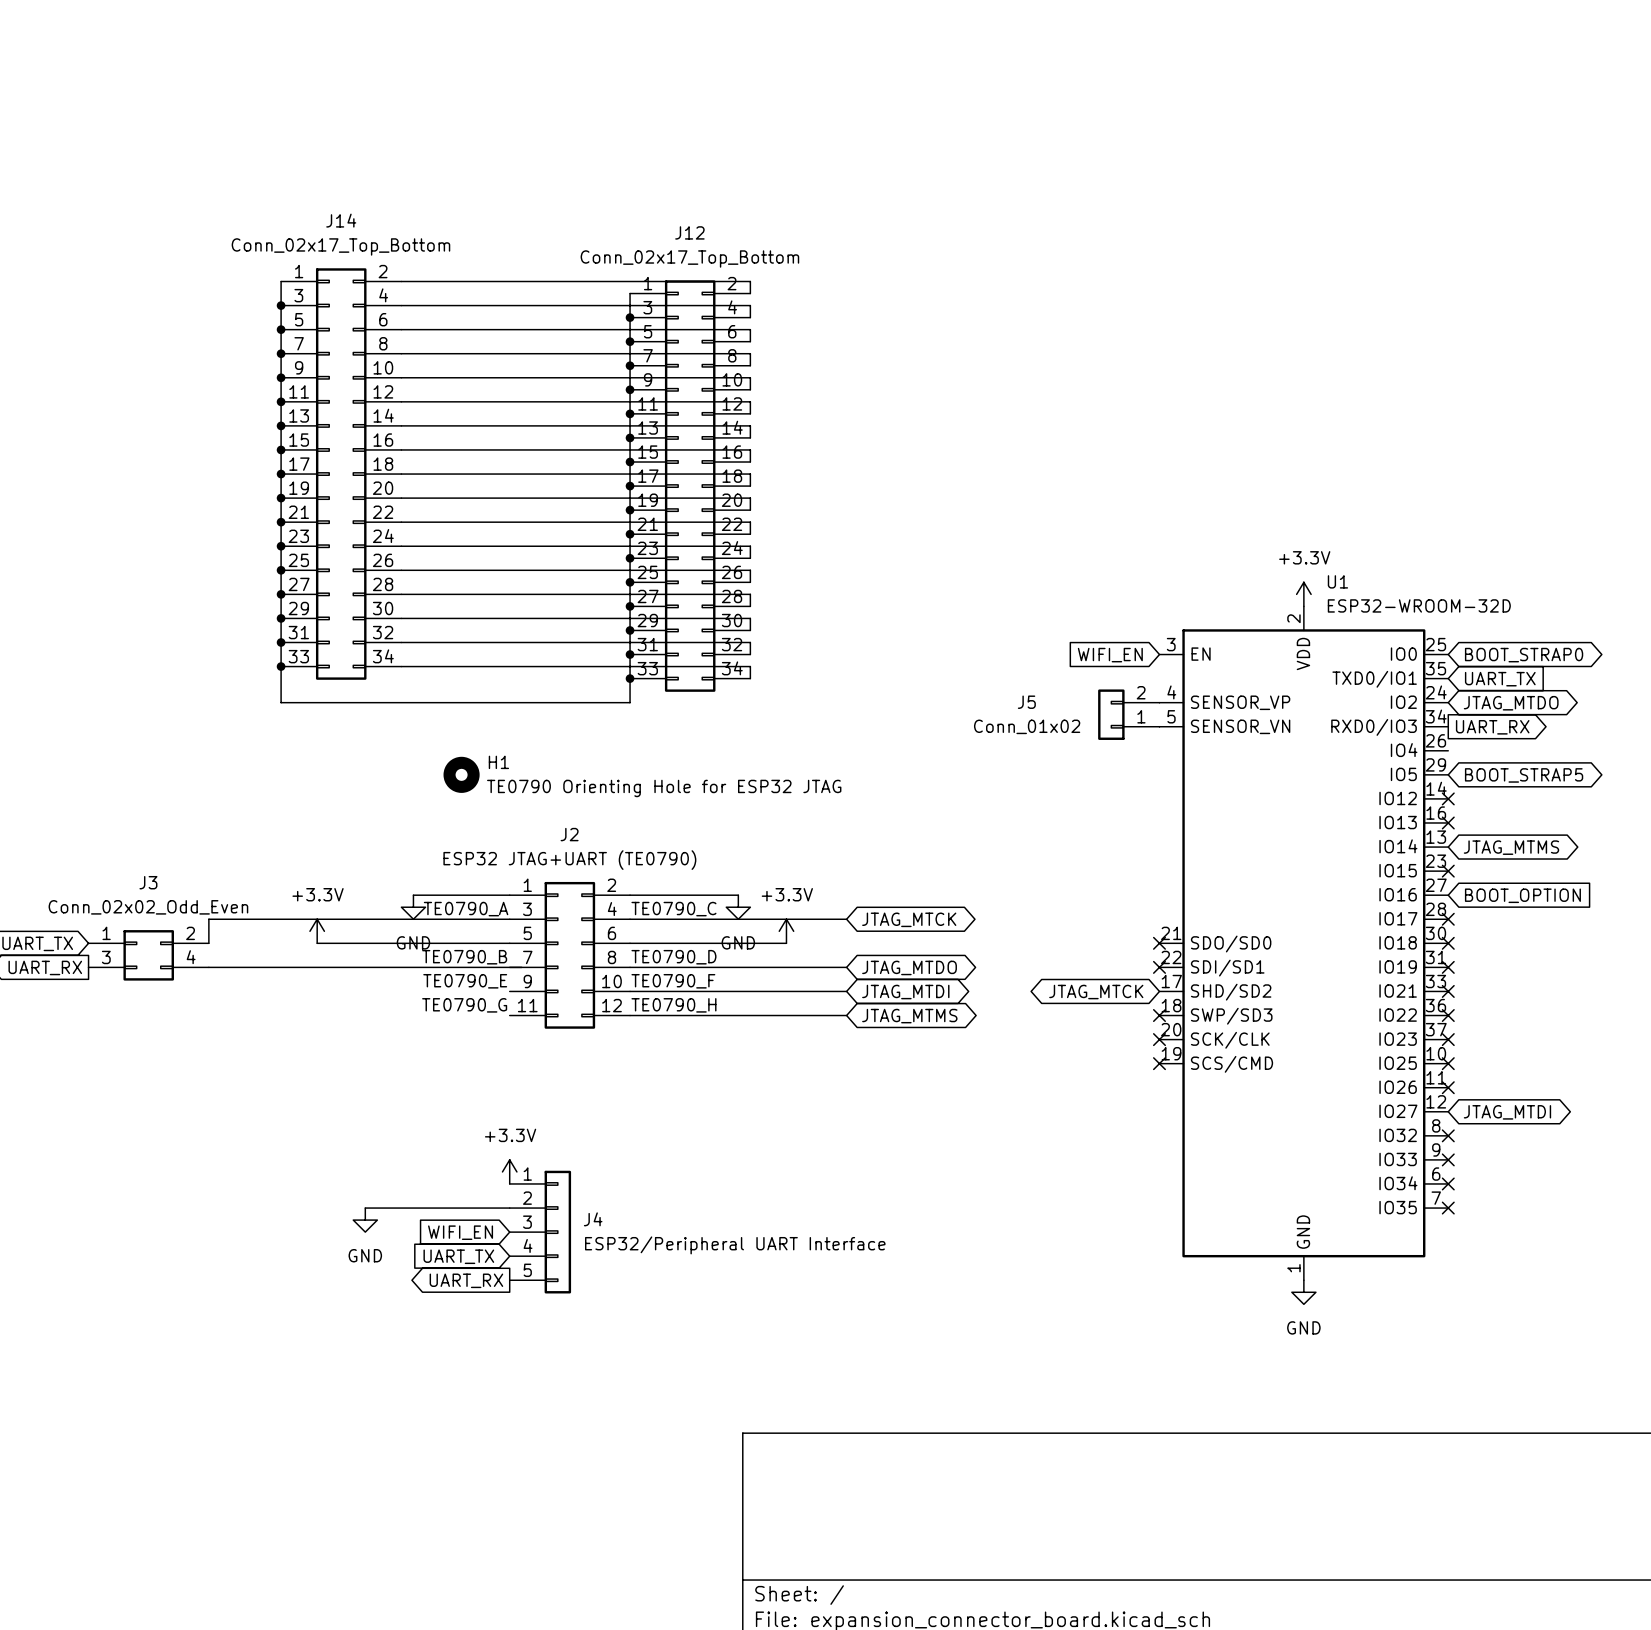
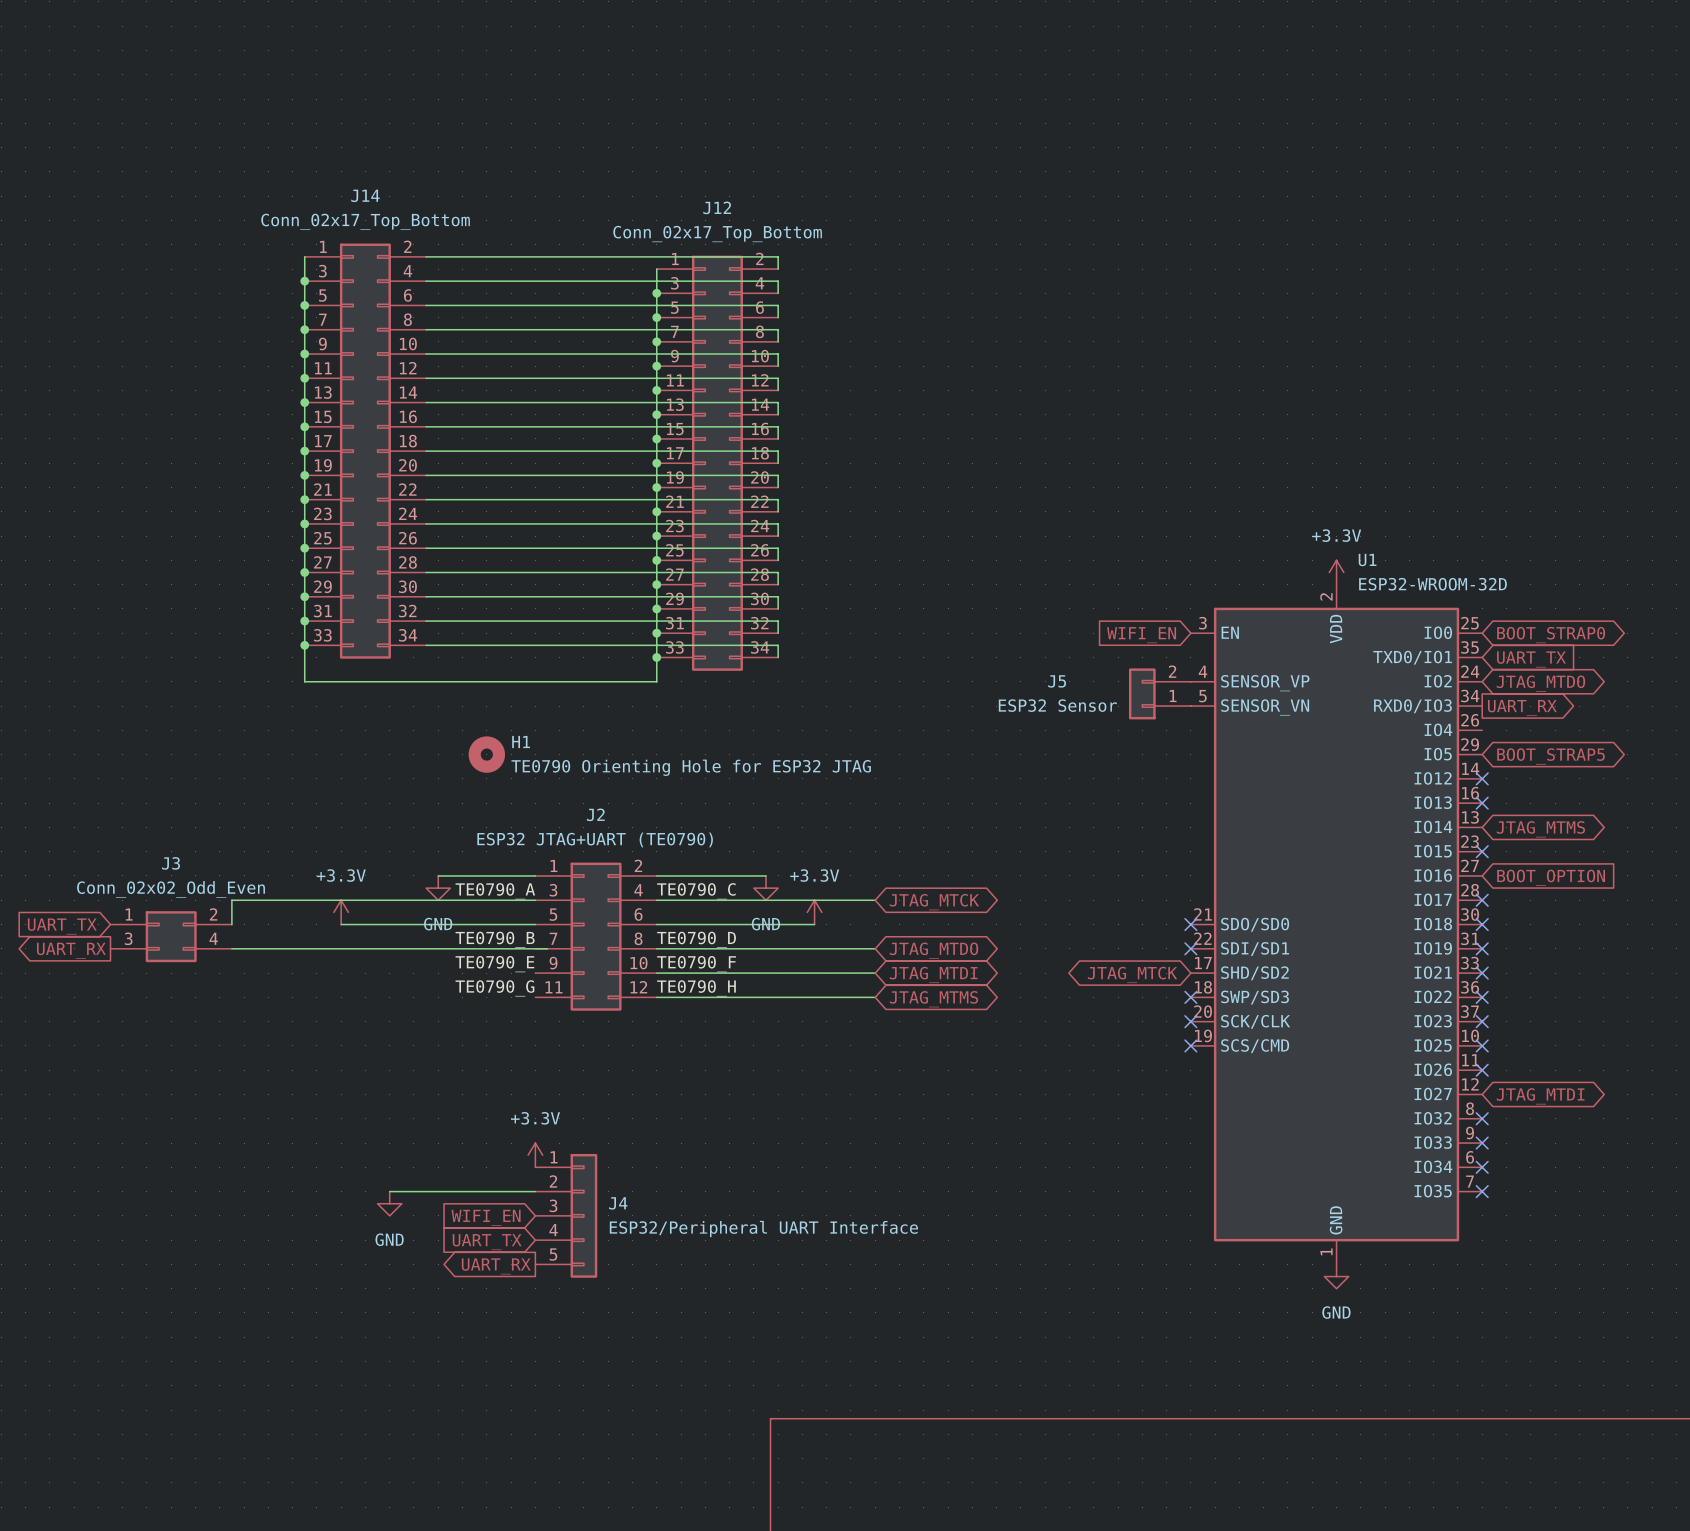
J5 value: Conn_01x02 (1027, 726) -> ESP32 Sensor (1057, 705)

